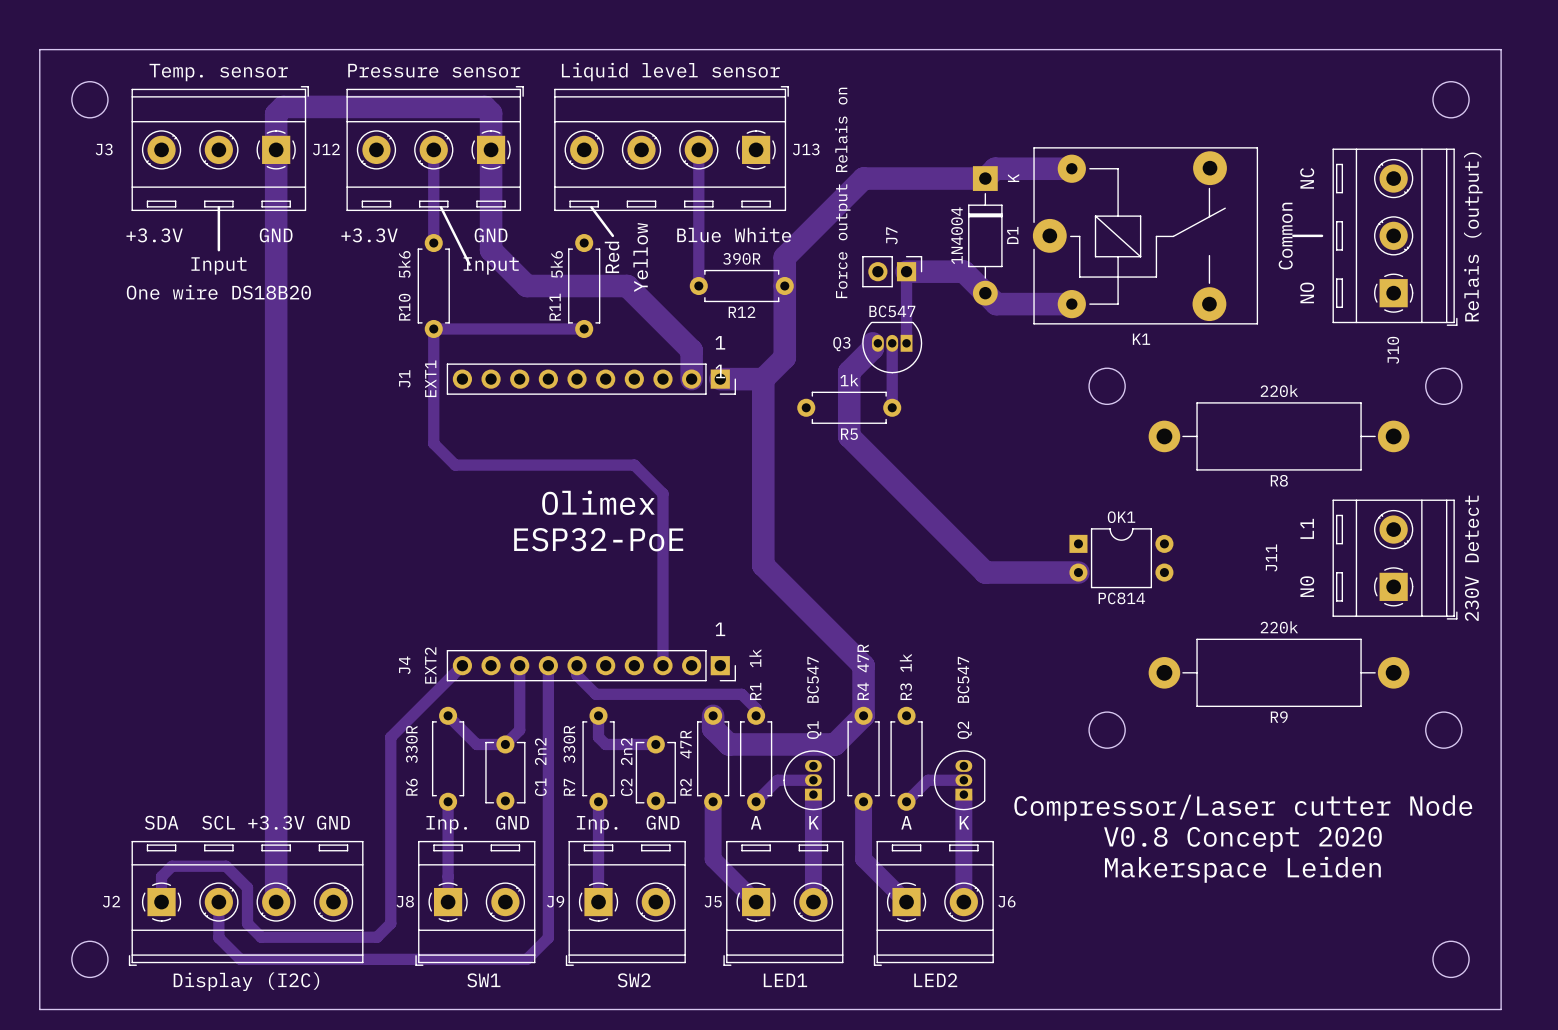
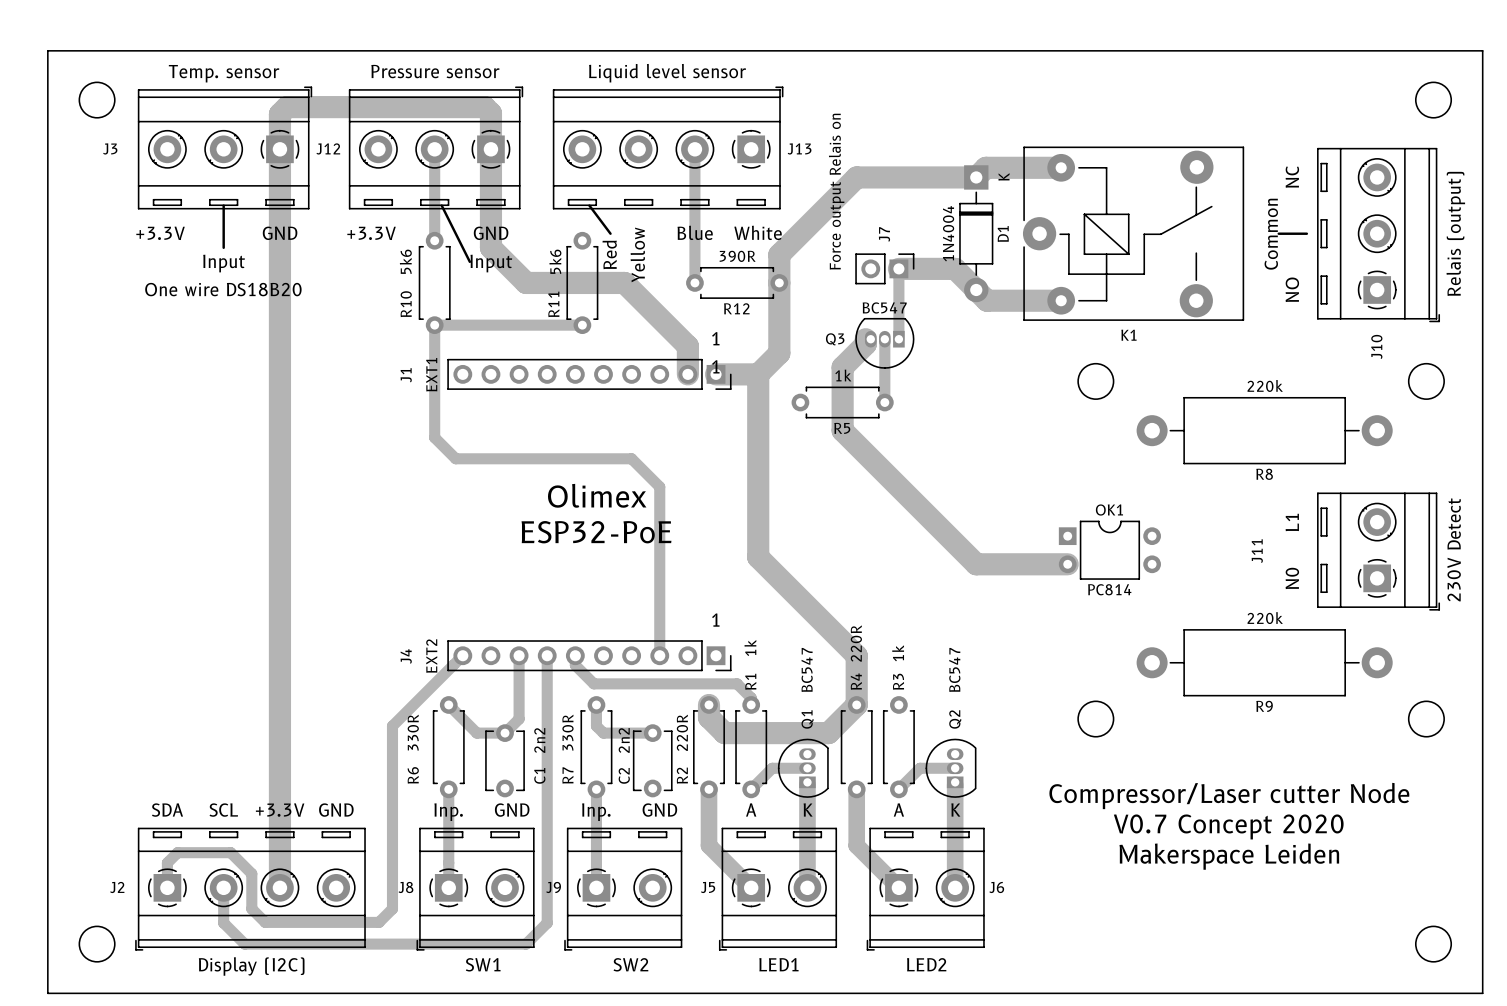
R4 value: 47R (863, 658) -> 220R (856, 643)
R2 value: 47R (685, 744) -> 220R (682, 732)
text: V0.8 Concept 2020 (1242, 839) -> V0.7 Concept 2020 (1228, 826)

